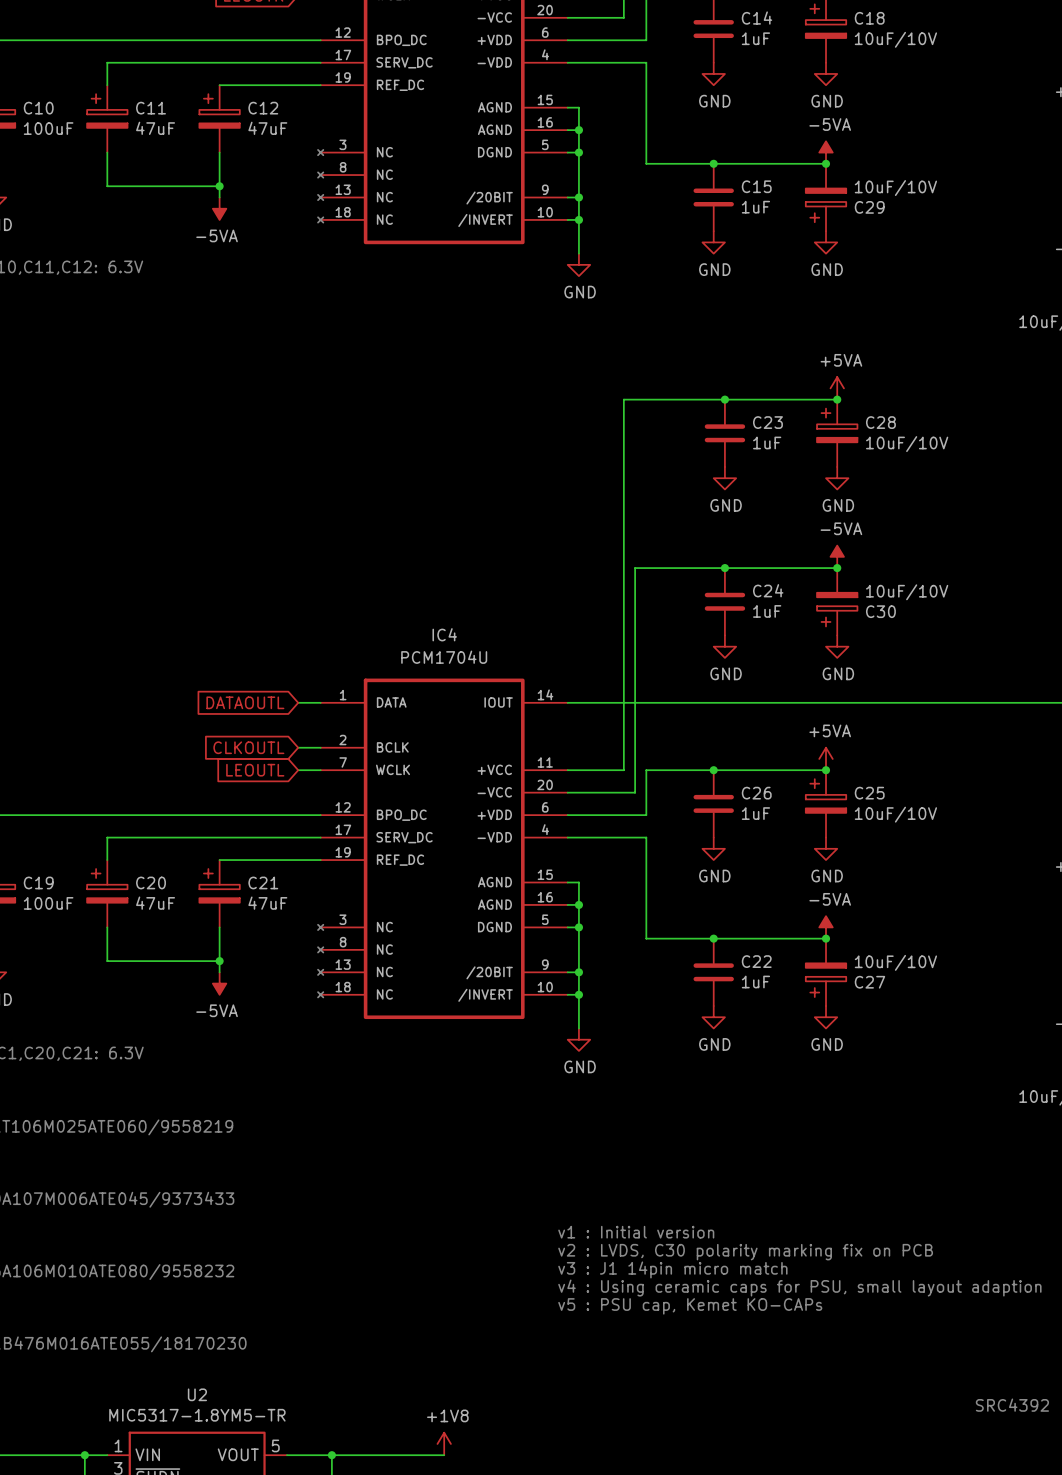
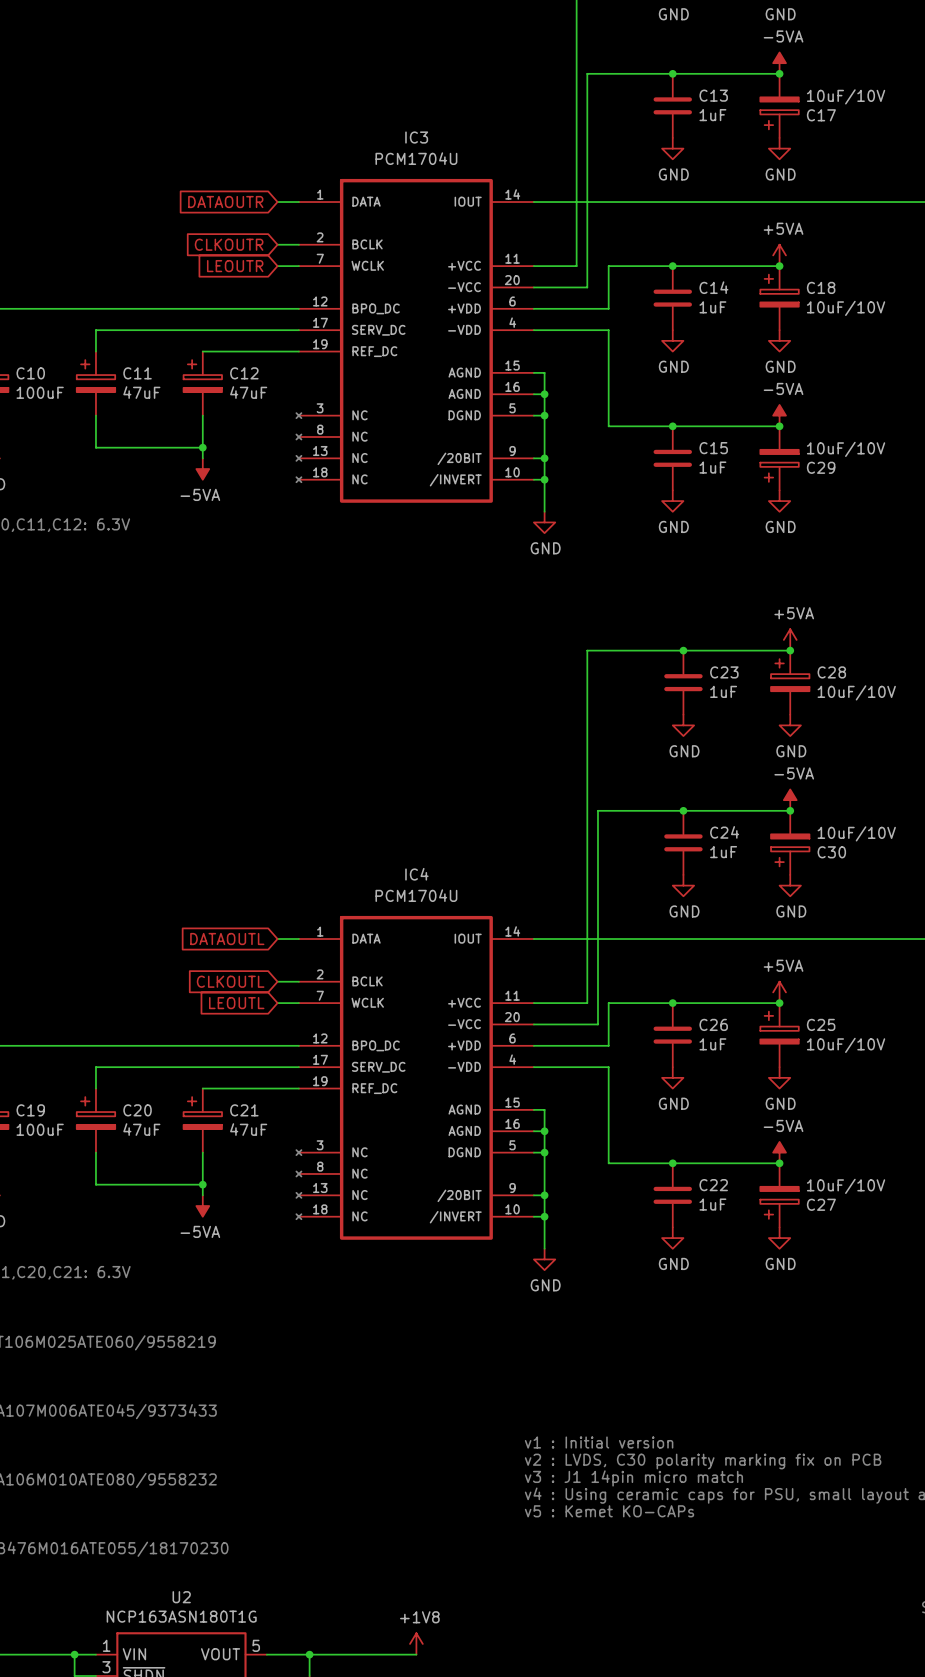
text: v5 : PSU cap, Kemet KO-CAPs (690, 1306) -> v5 : Kemet KO-CAPs (609, 1511)
U2 value: MIC5317-1.8YM5-TR (197, 1415) -> NCP163ASN180T1G (181, 1616)

